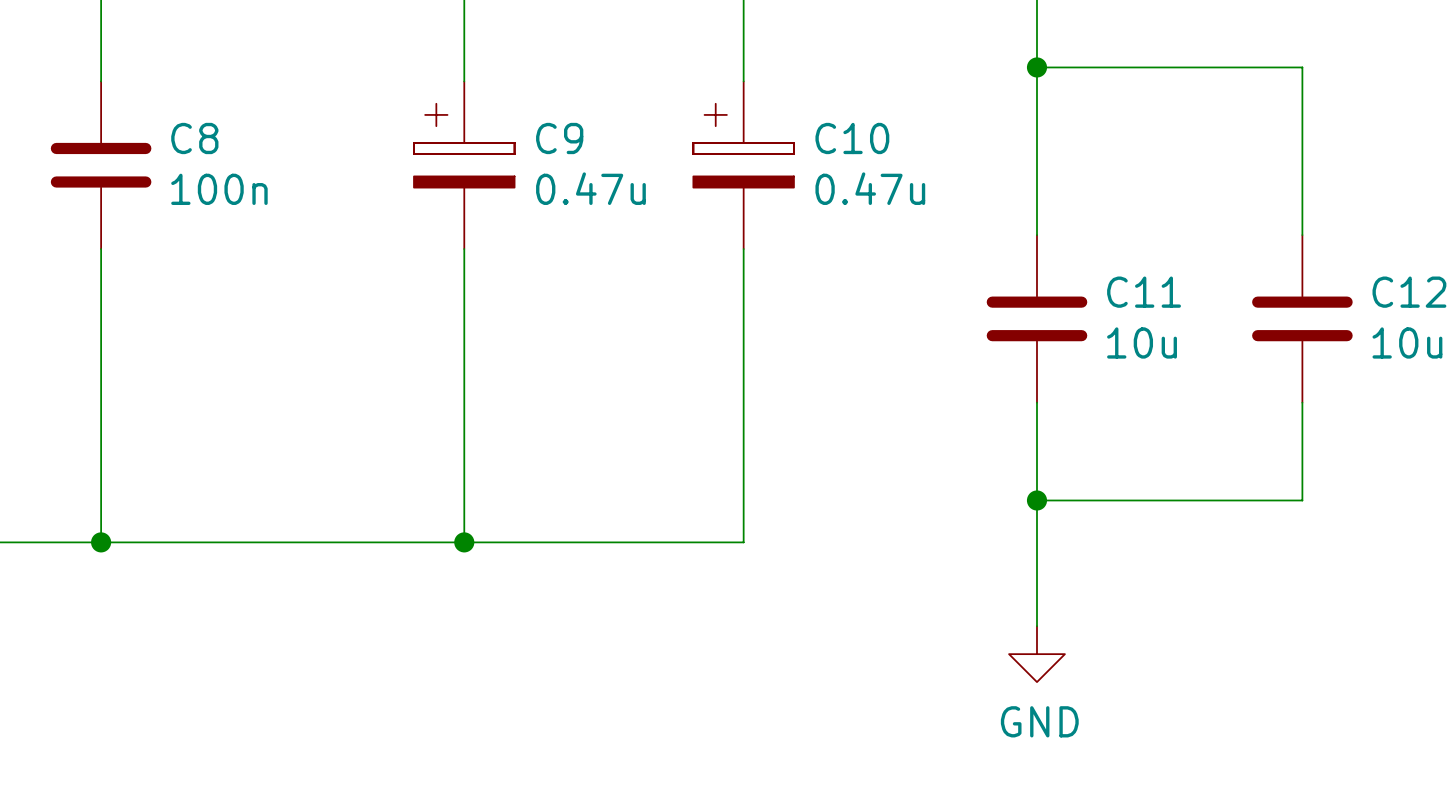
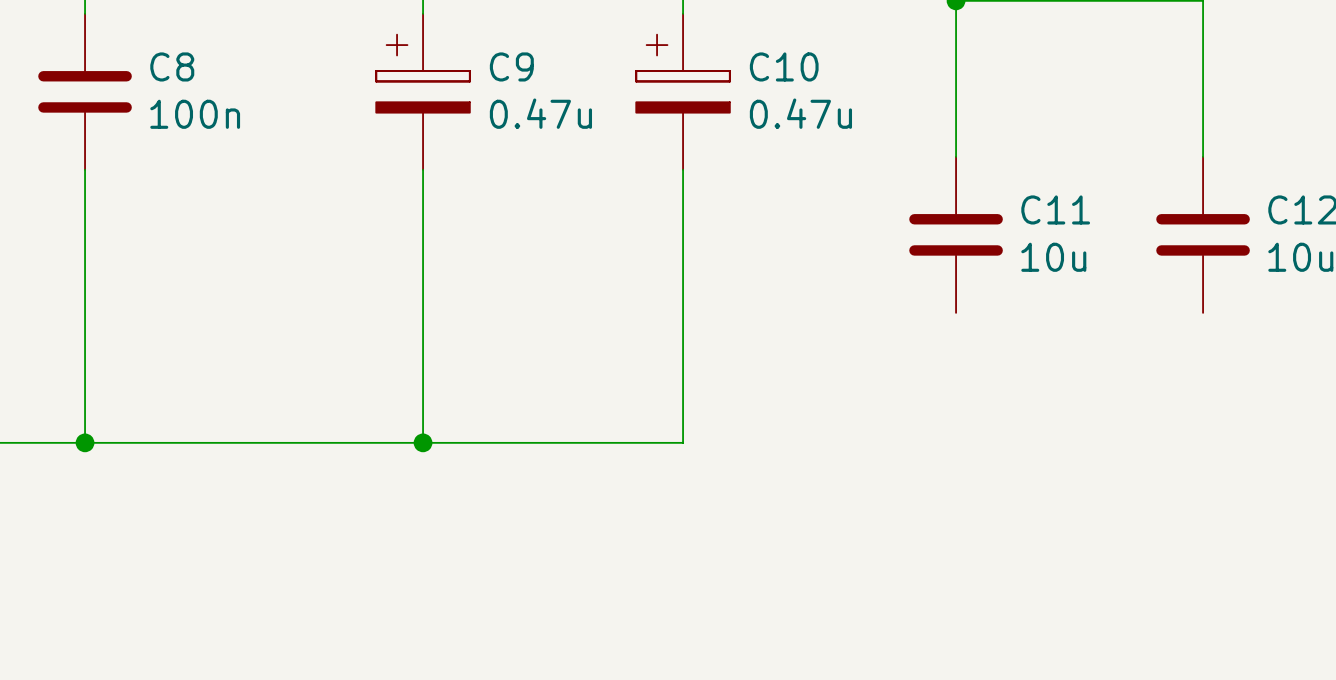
wire: (1036, 402) (1036, 626) -> none
wire: (1302, 402) (1302, 500) (1036, 500) -> none
junction: (1036, 500) -> none
power symbol: GND (1036, 654) -> none

